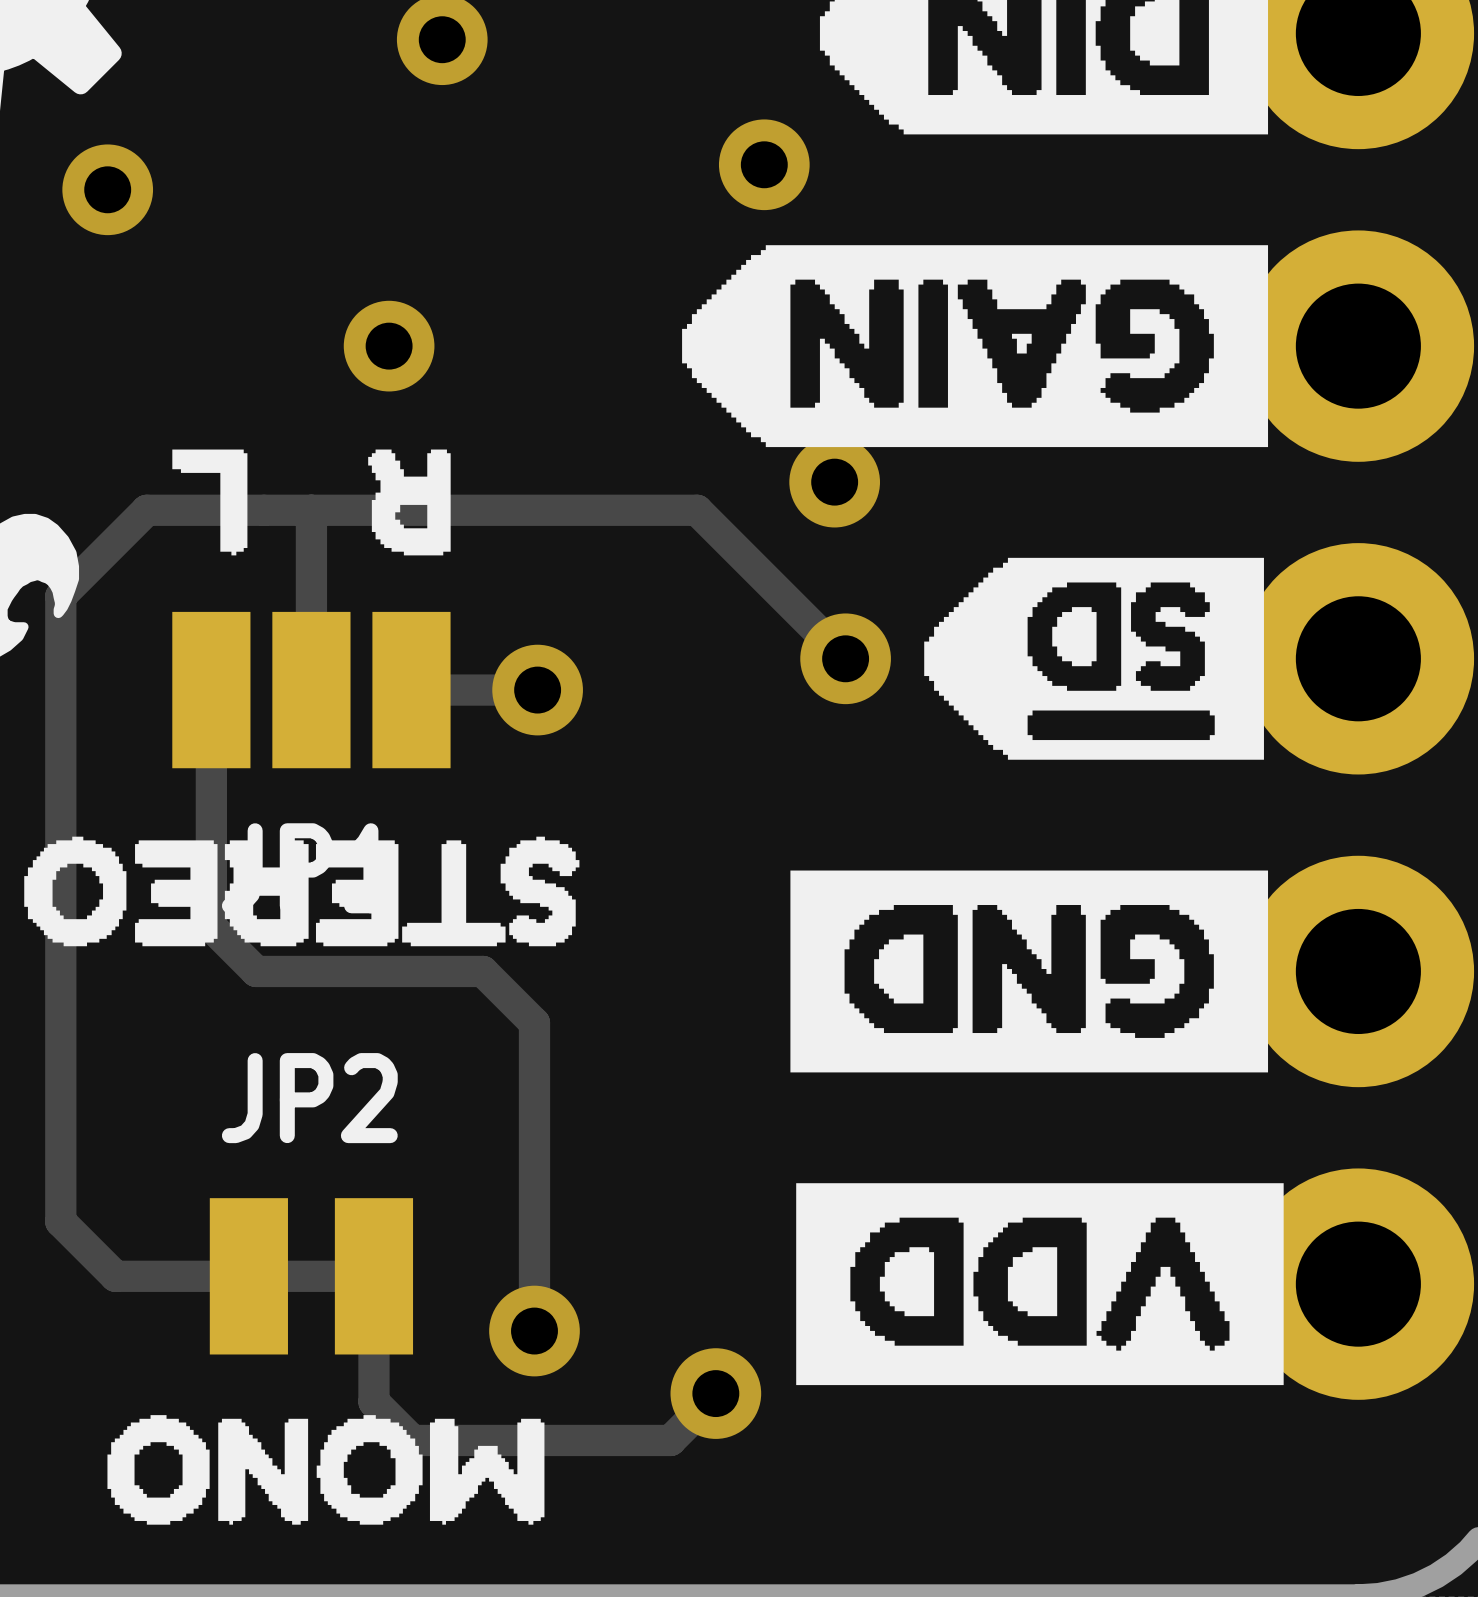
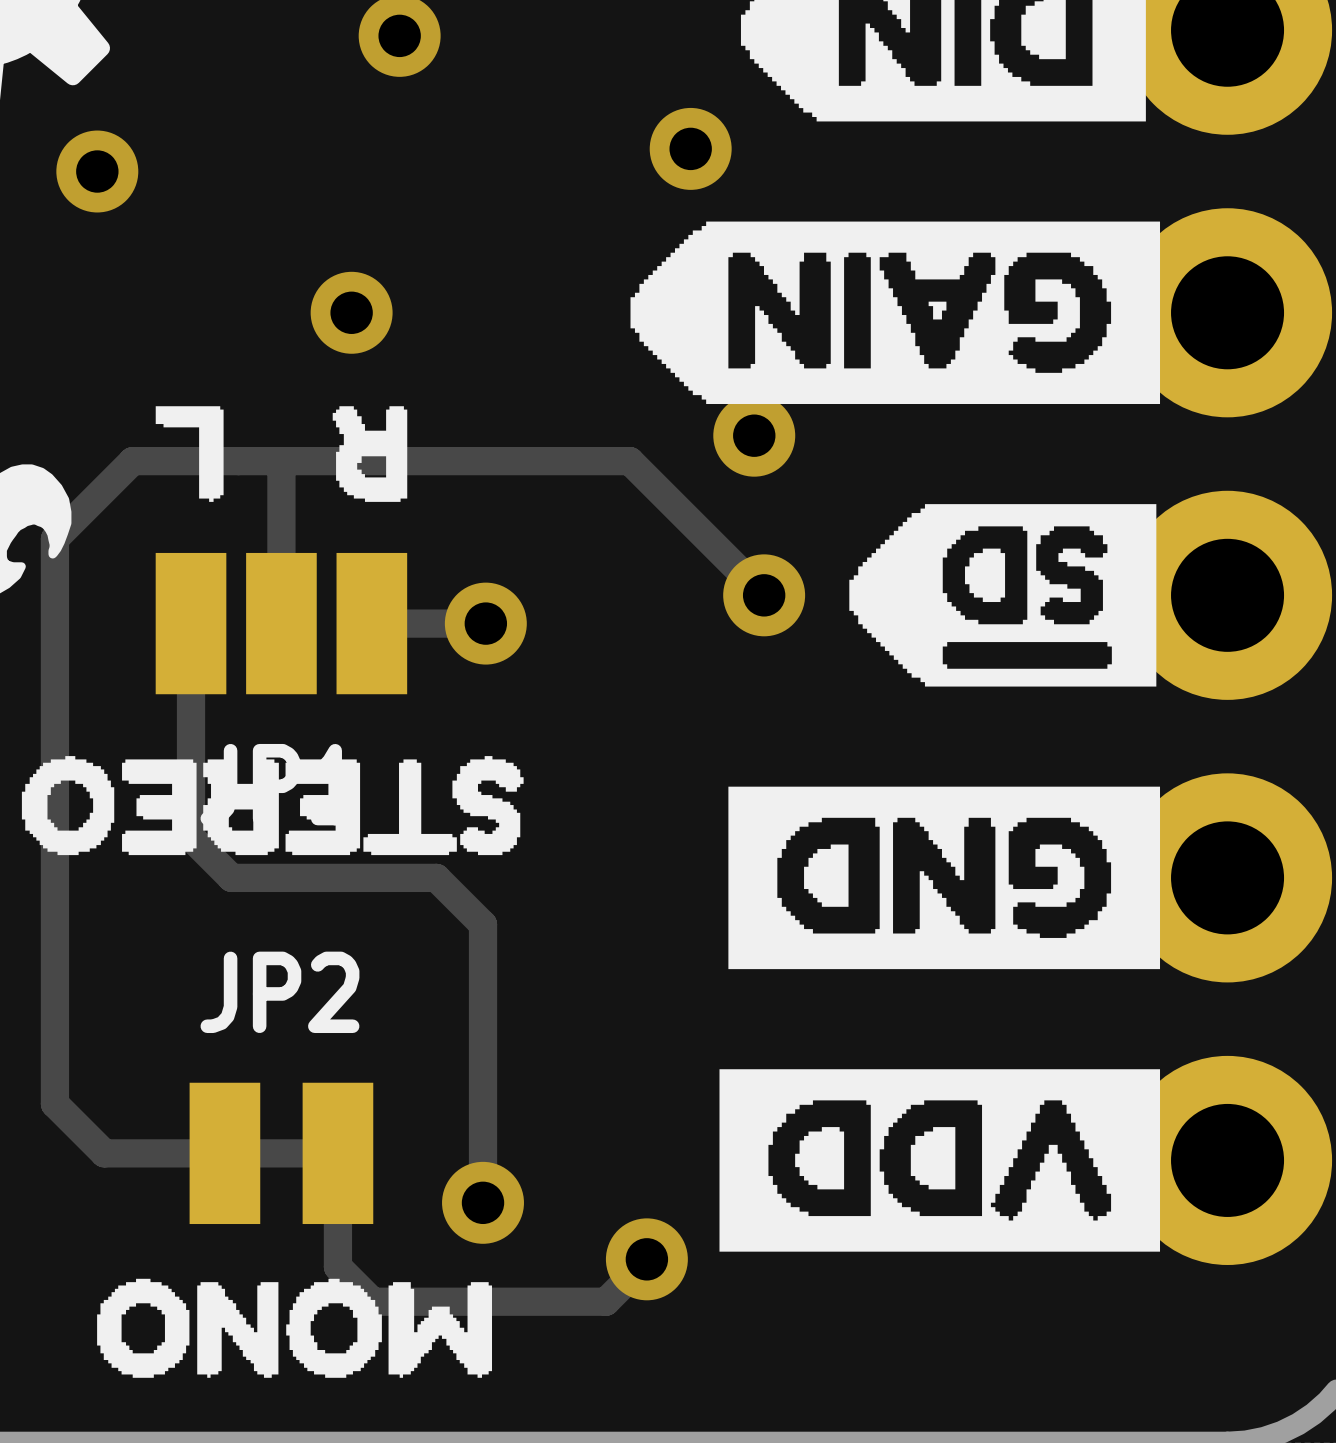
drawing position: (975, 346) -> (895, 312)
drawing position: (1094, 658) -> (1002, 595)
drawing position: (1029, 971) -> (944, 877)

